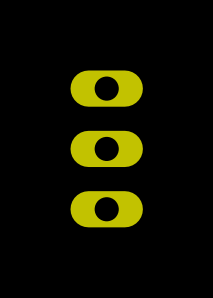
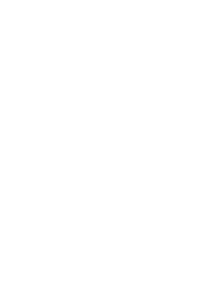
part: (106, 148) -> none

